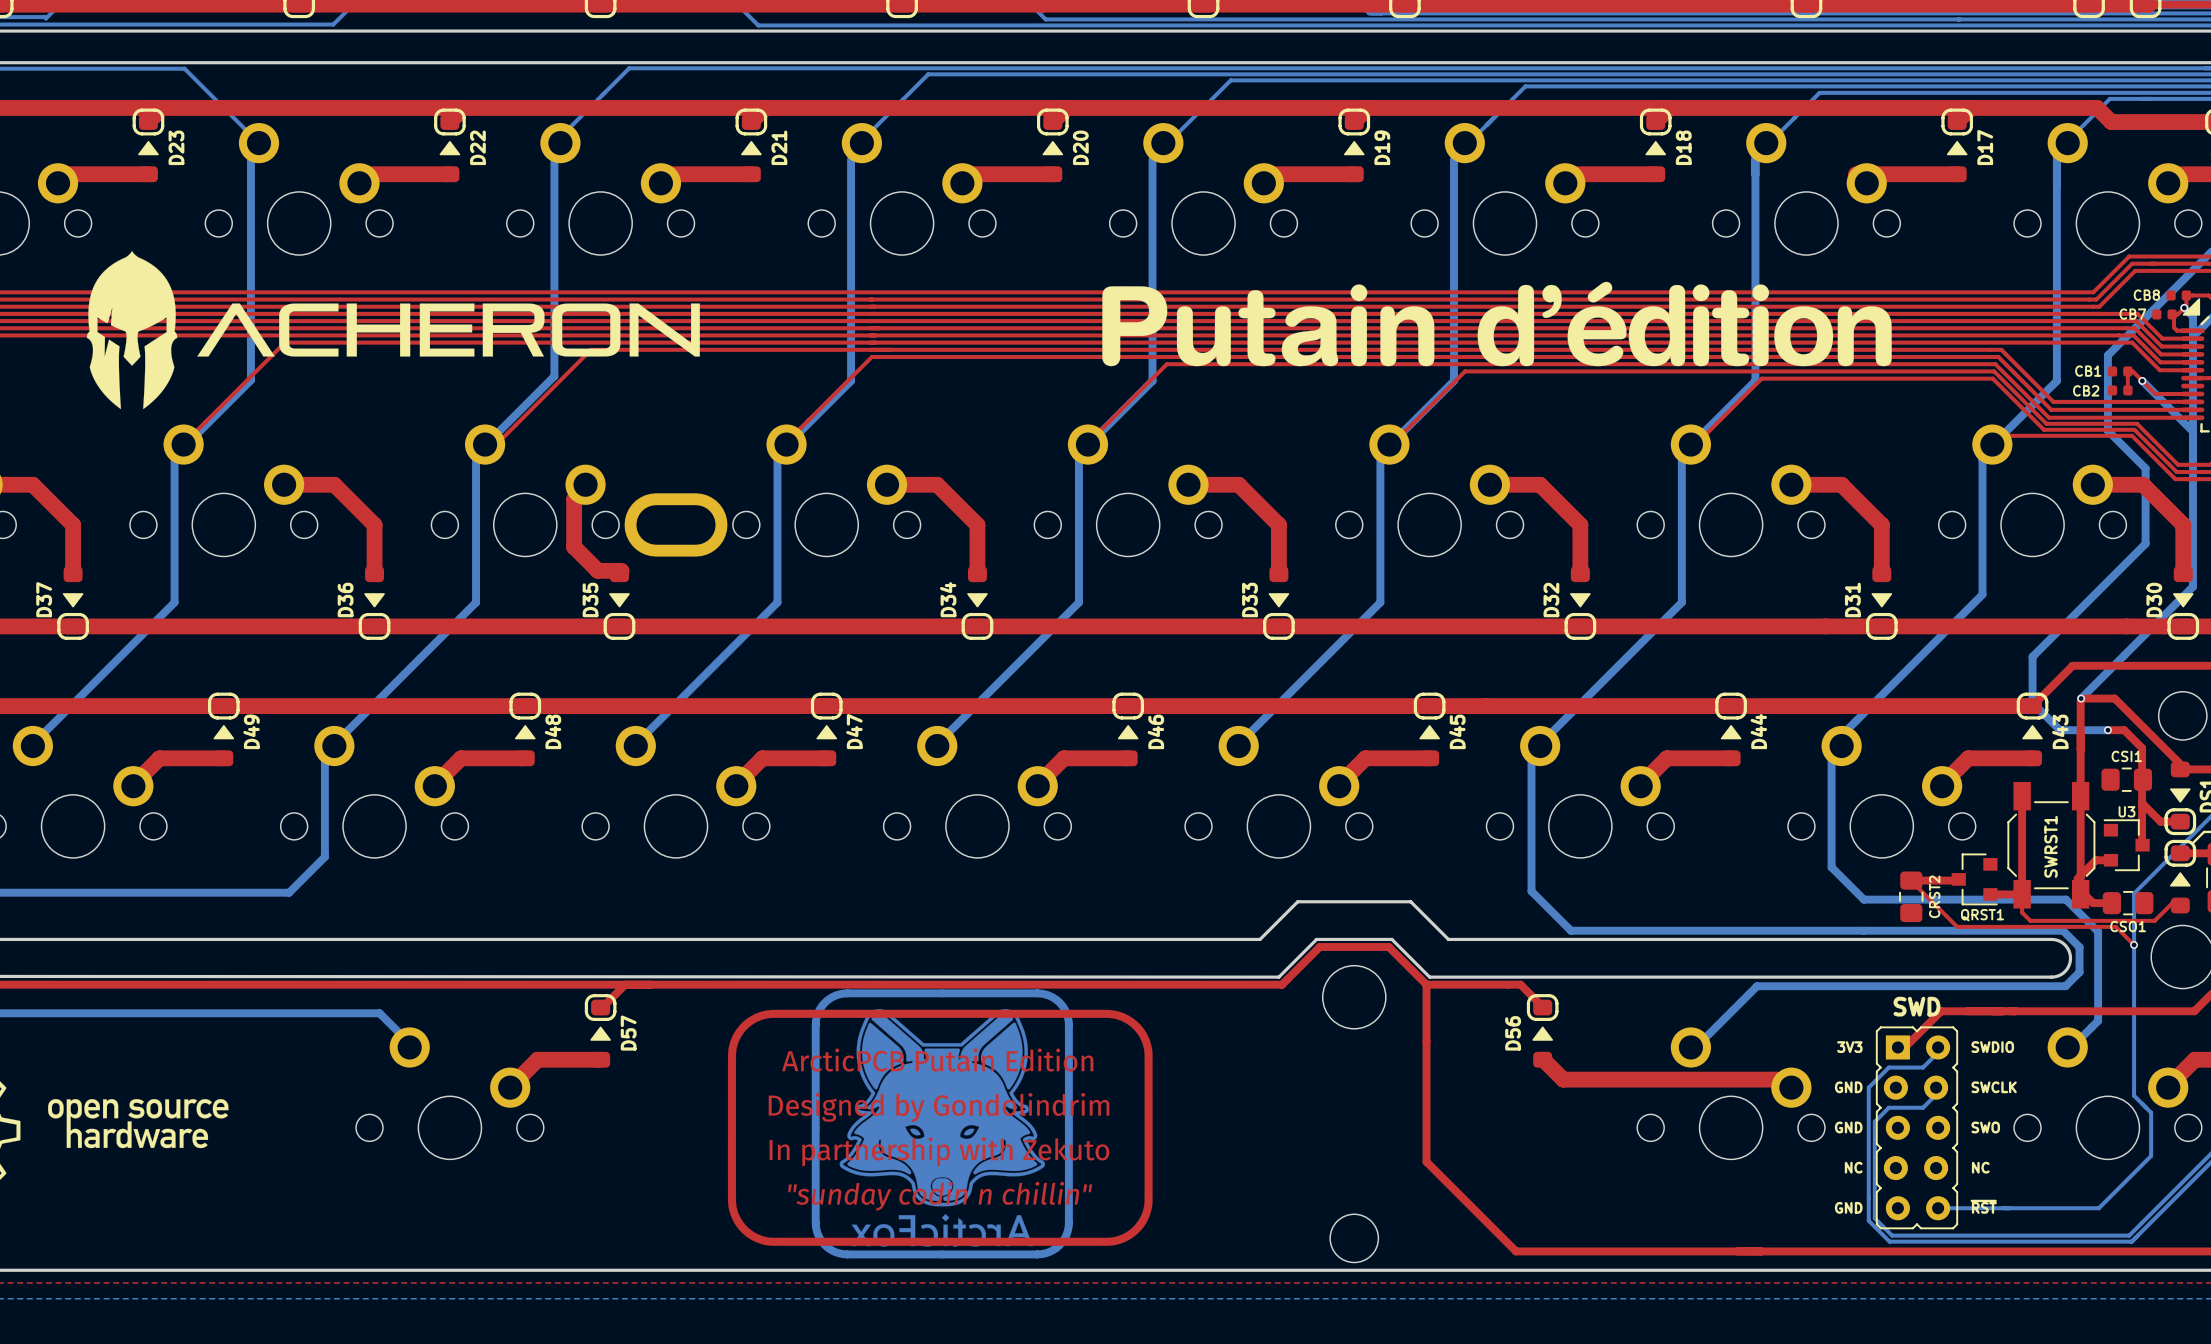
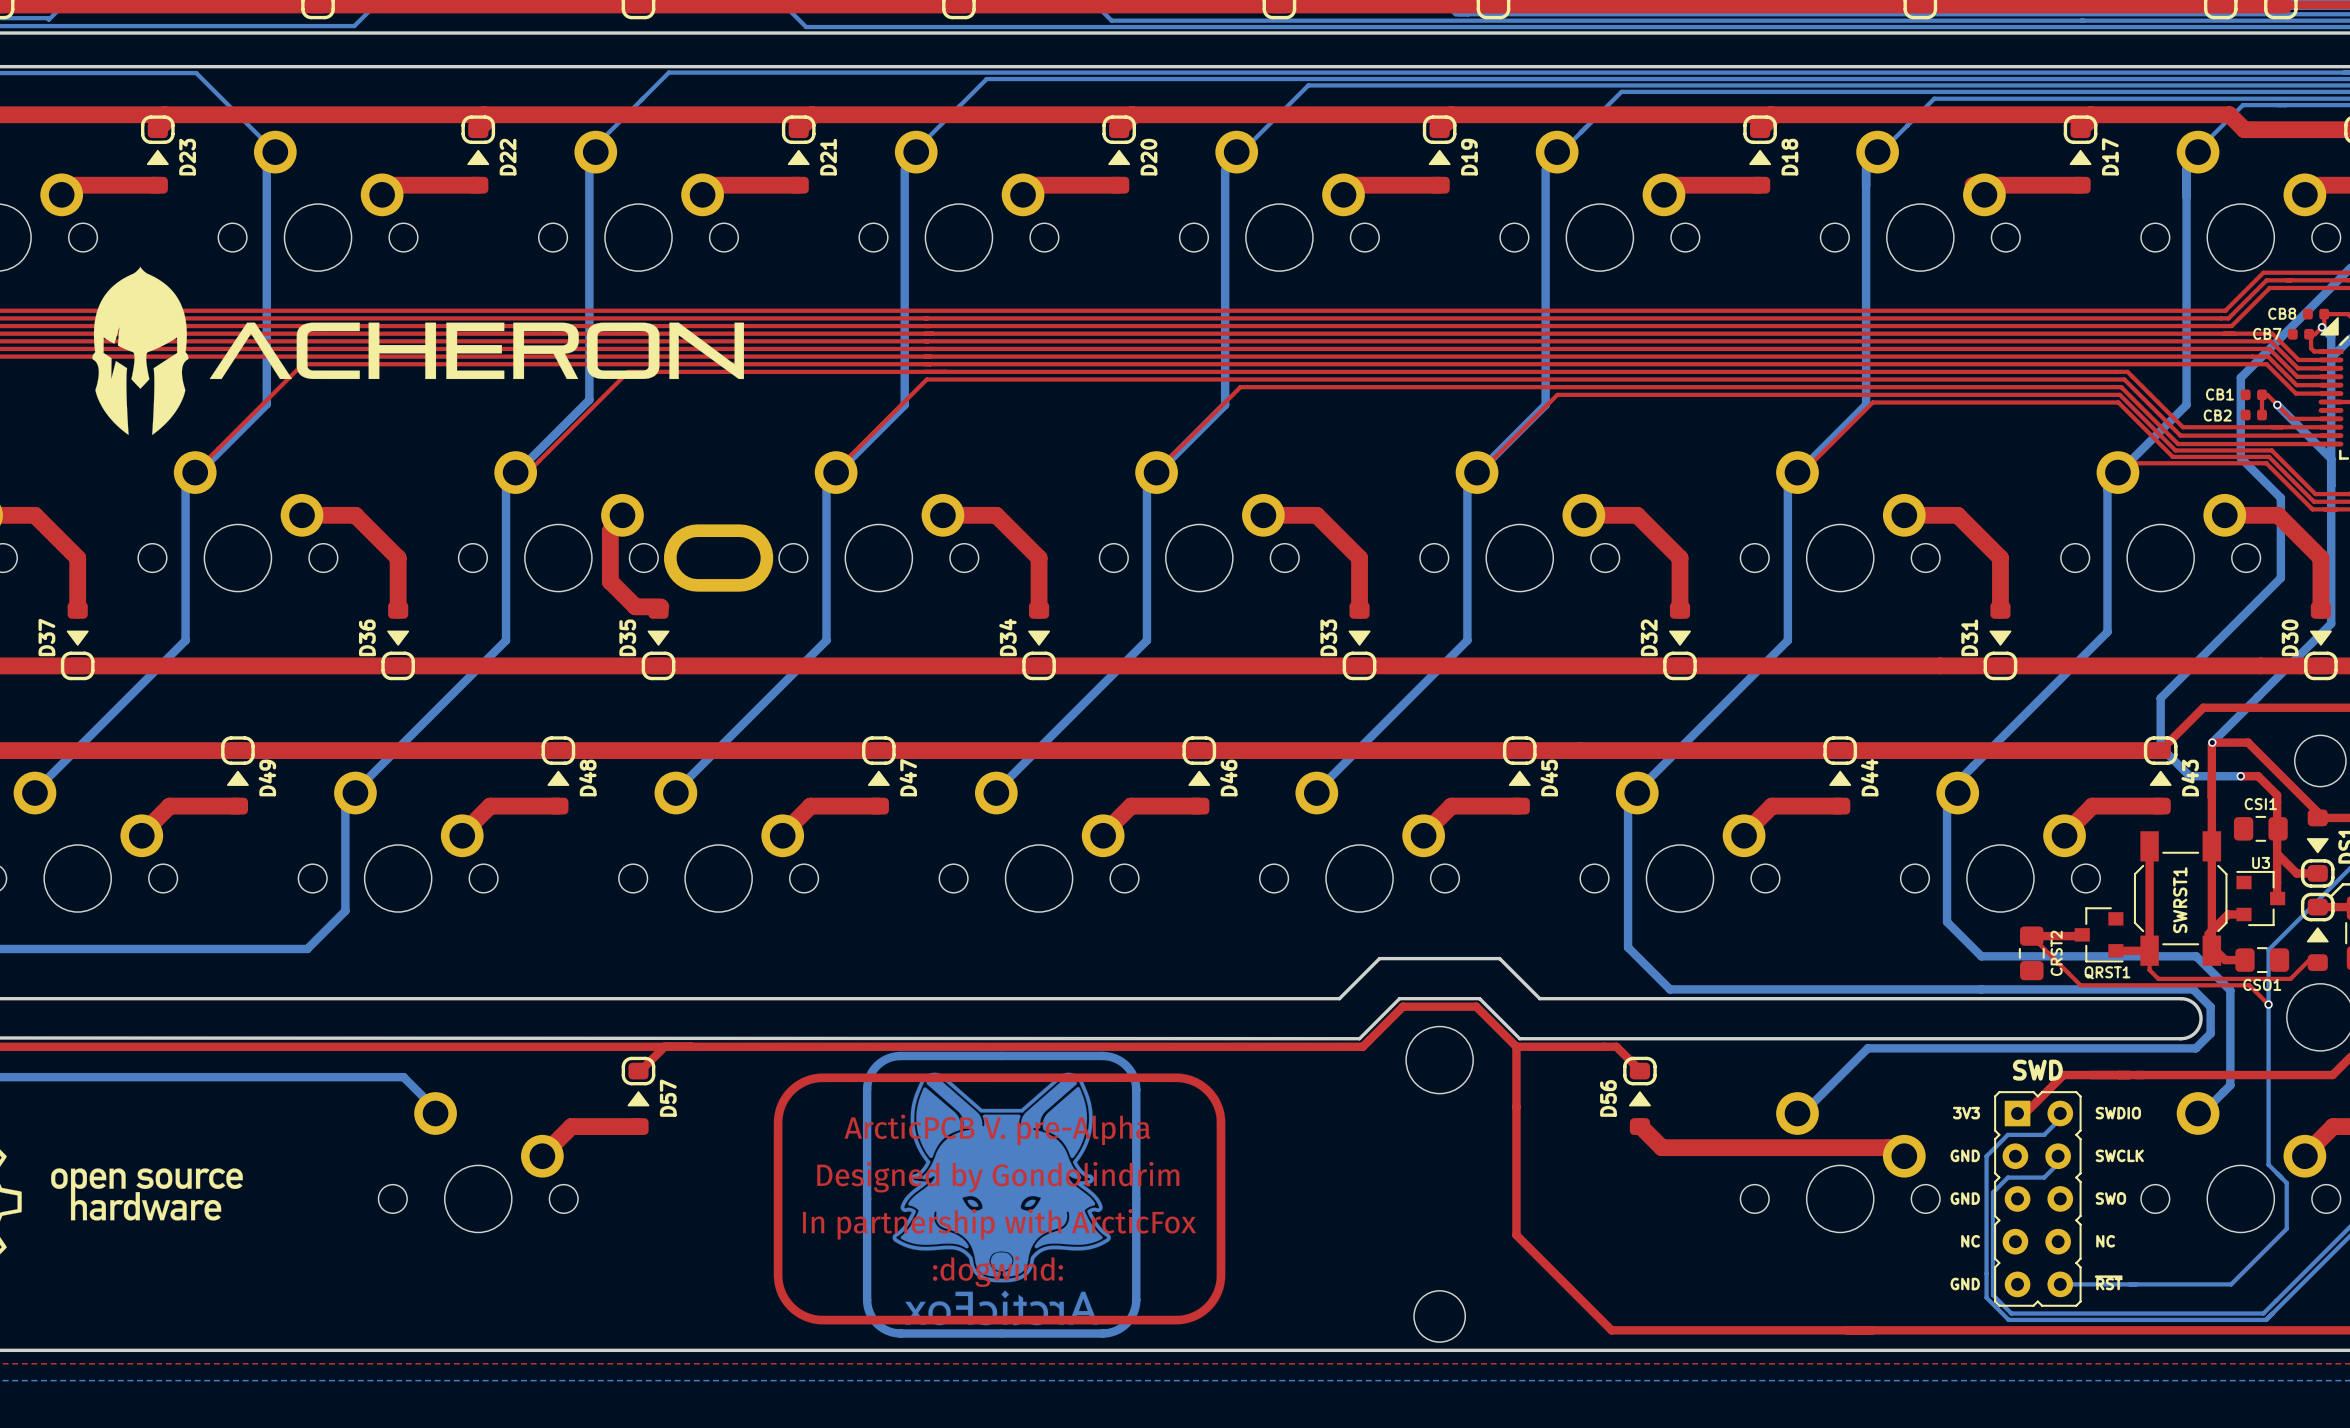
drawing: [1102, 281, 1892, 367] -> none
drawing: none -> [773, 1073, 1226, 1325]
part: (940, 1127) -> none

